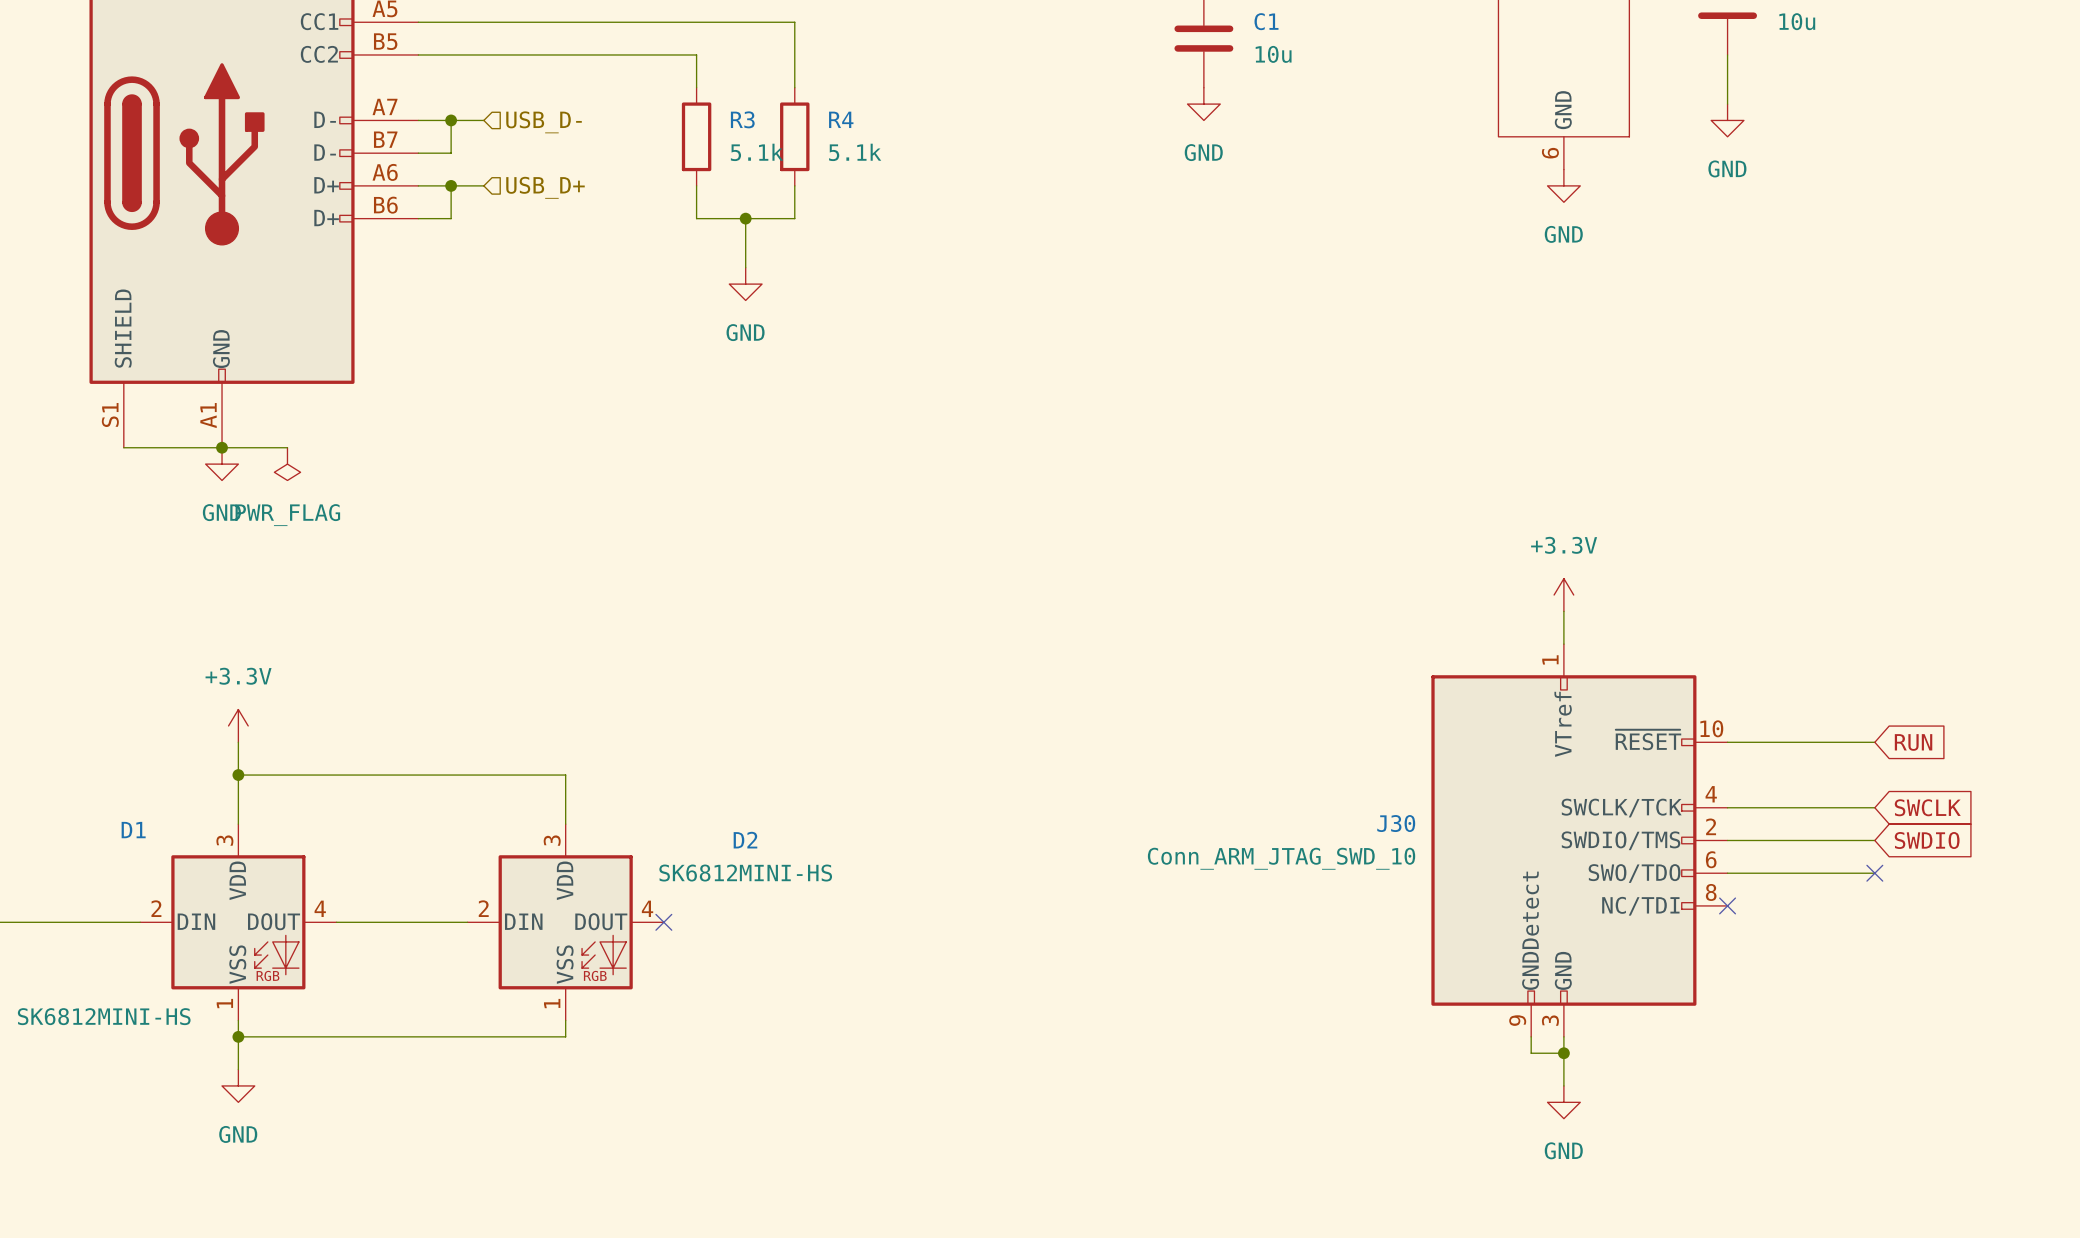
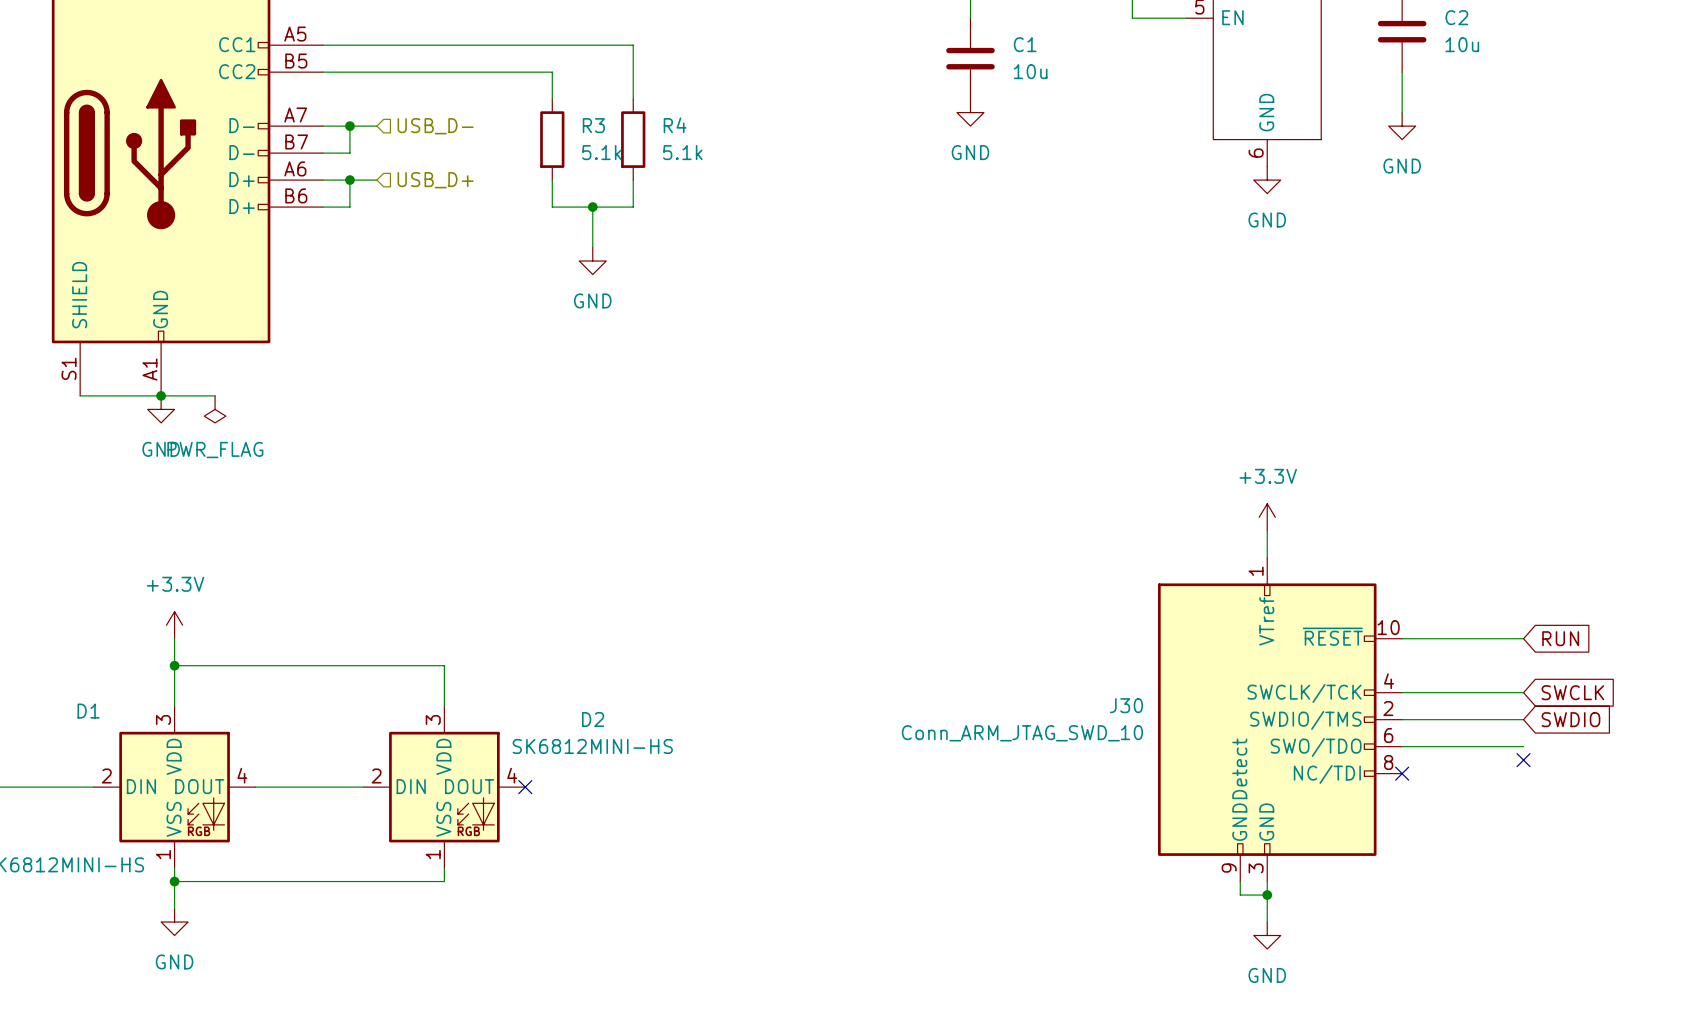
no-connect mark position: (1874, 873) -> (1523, 760)

